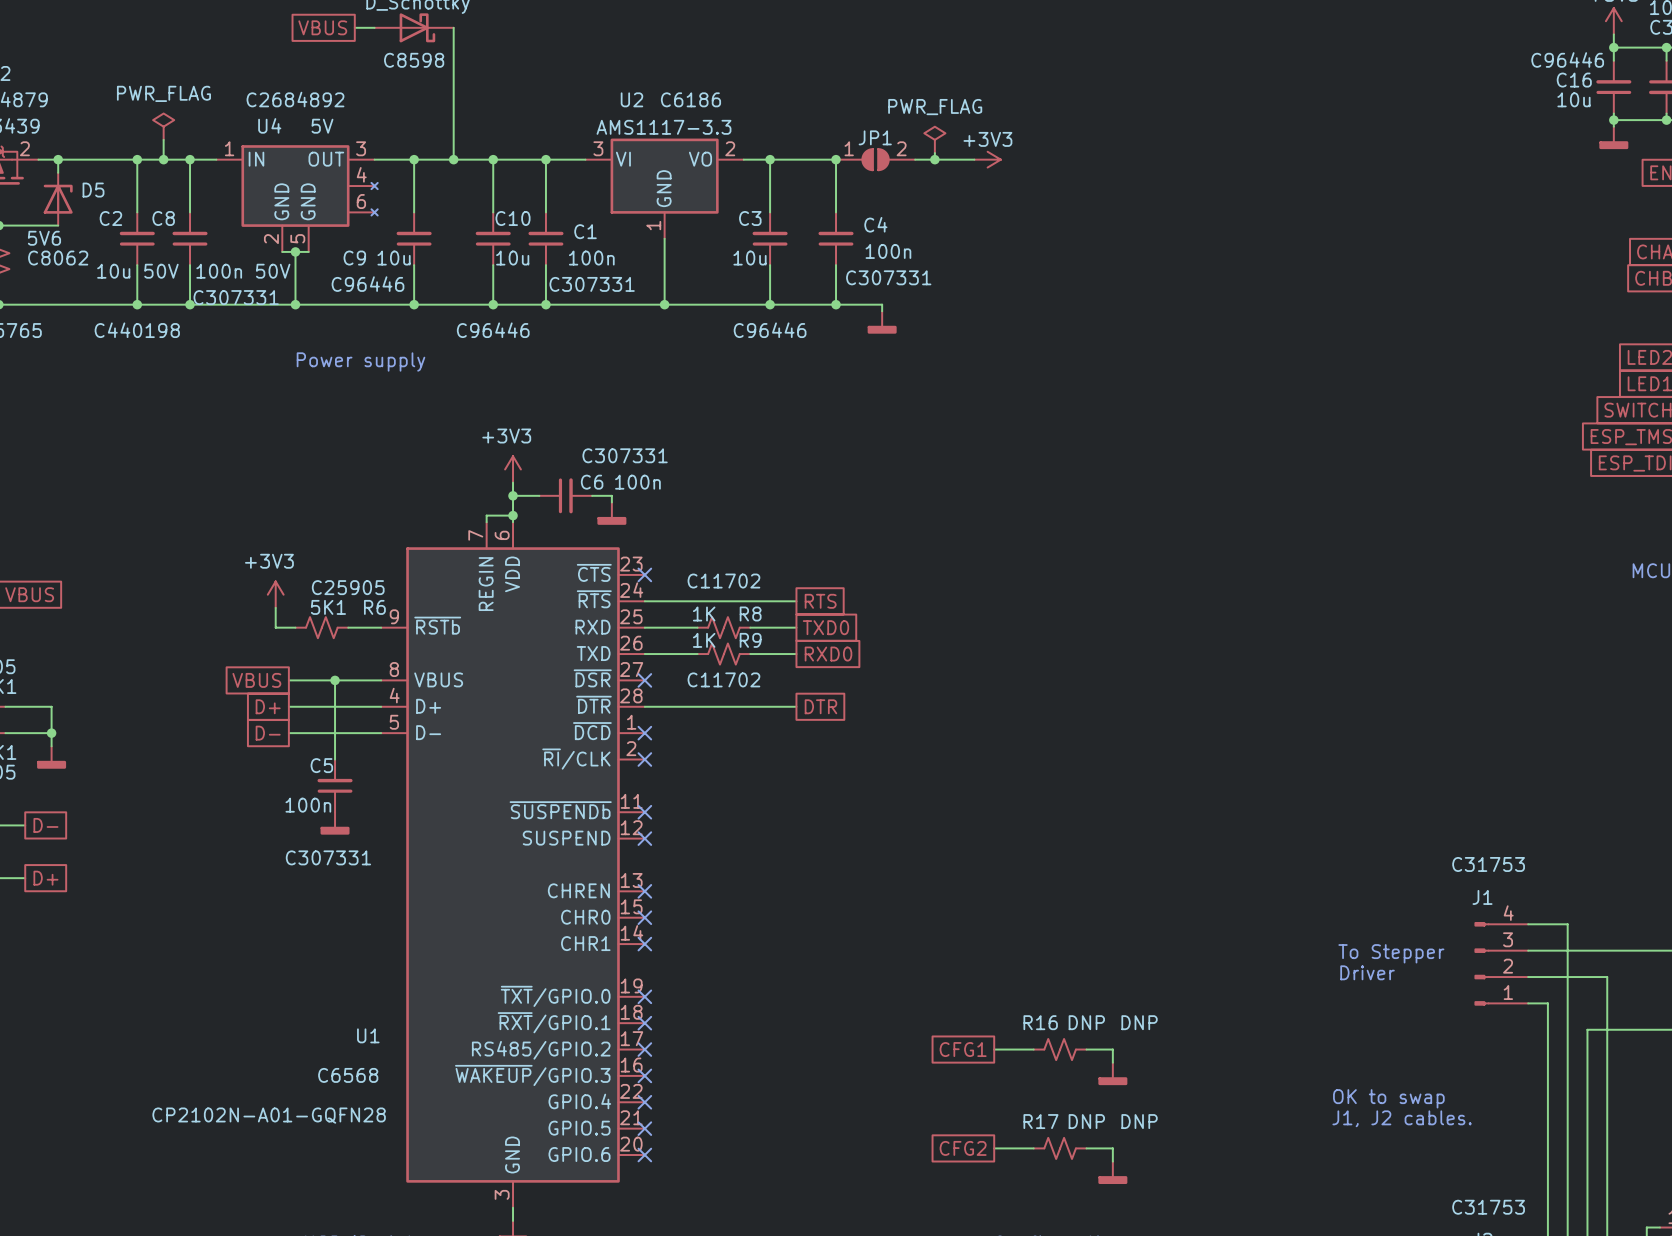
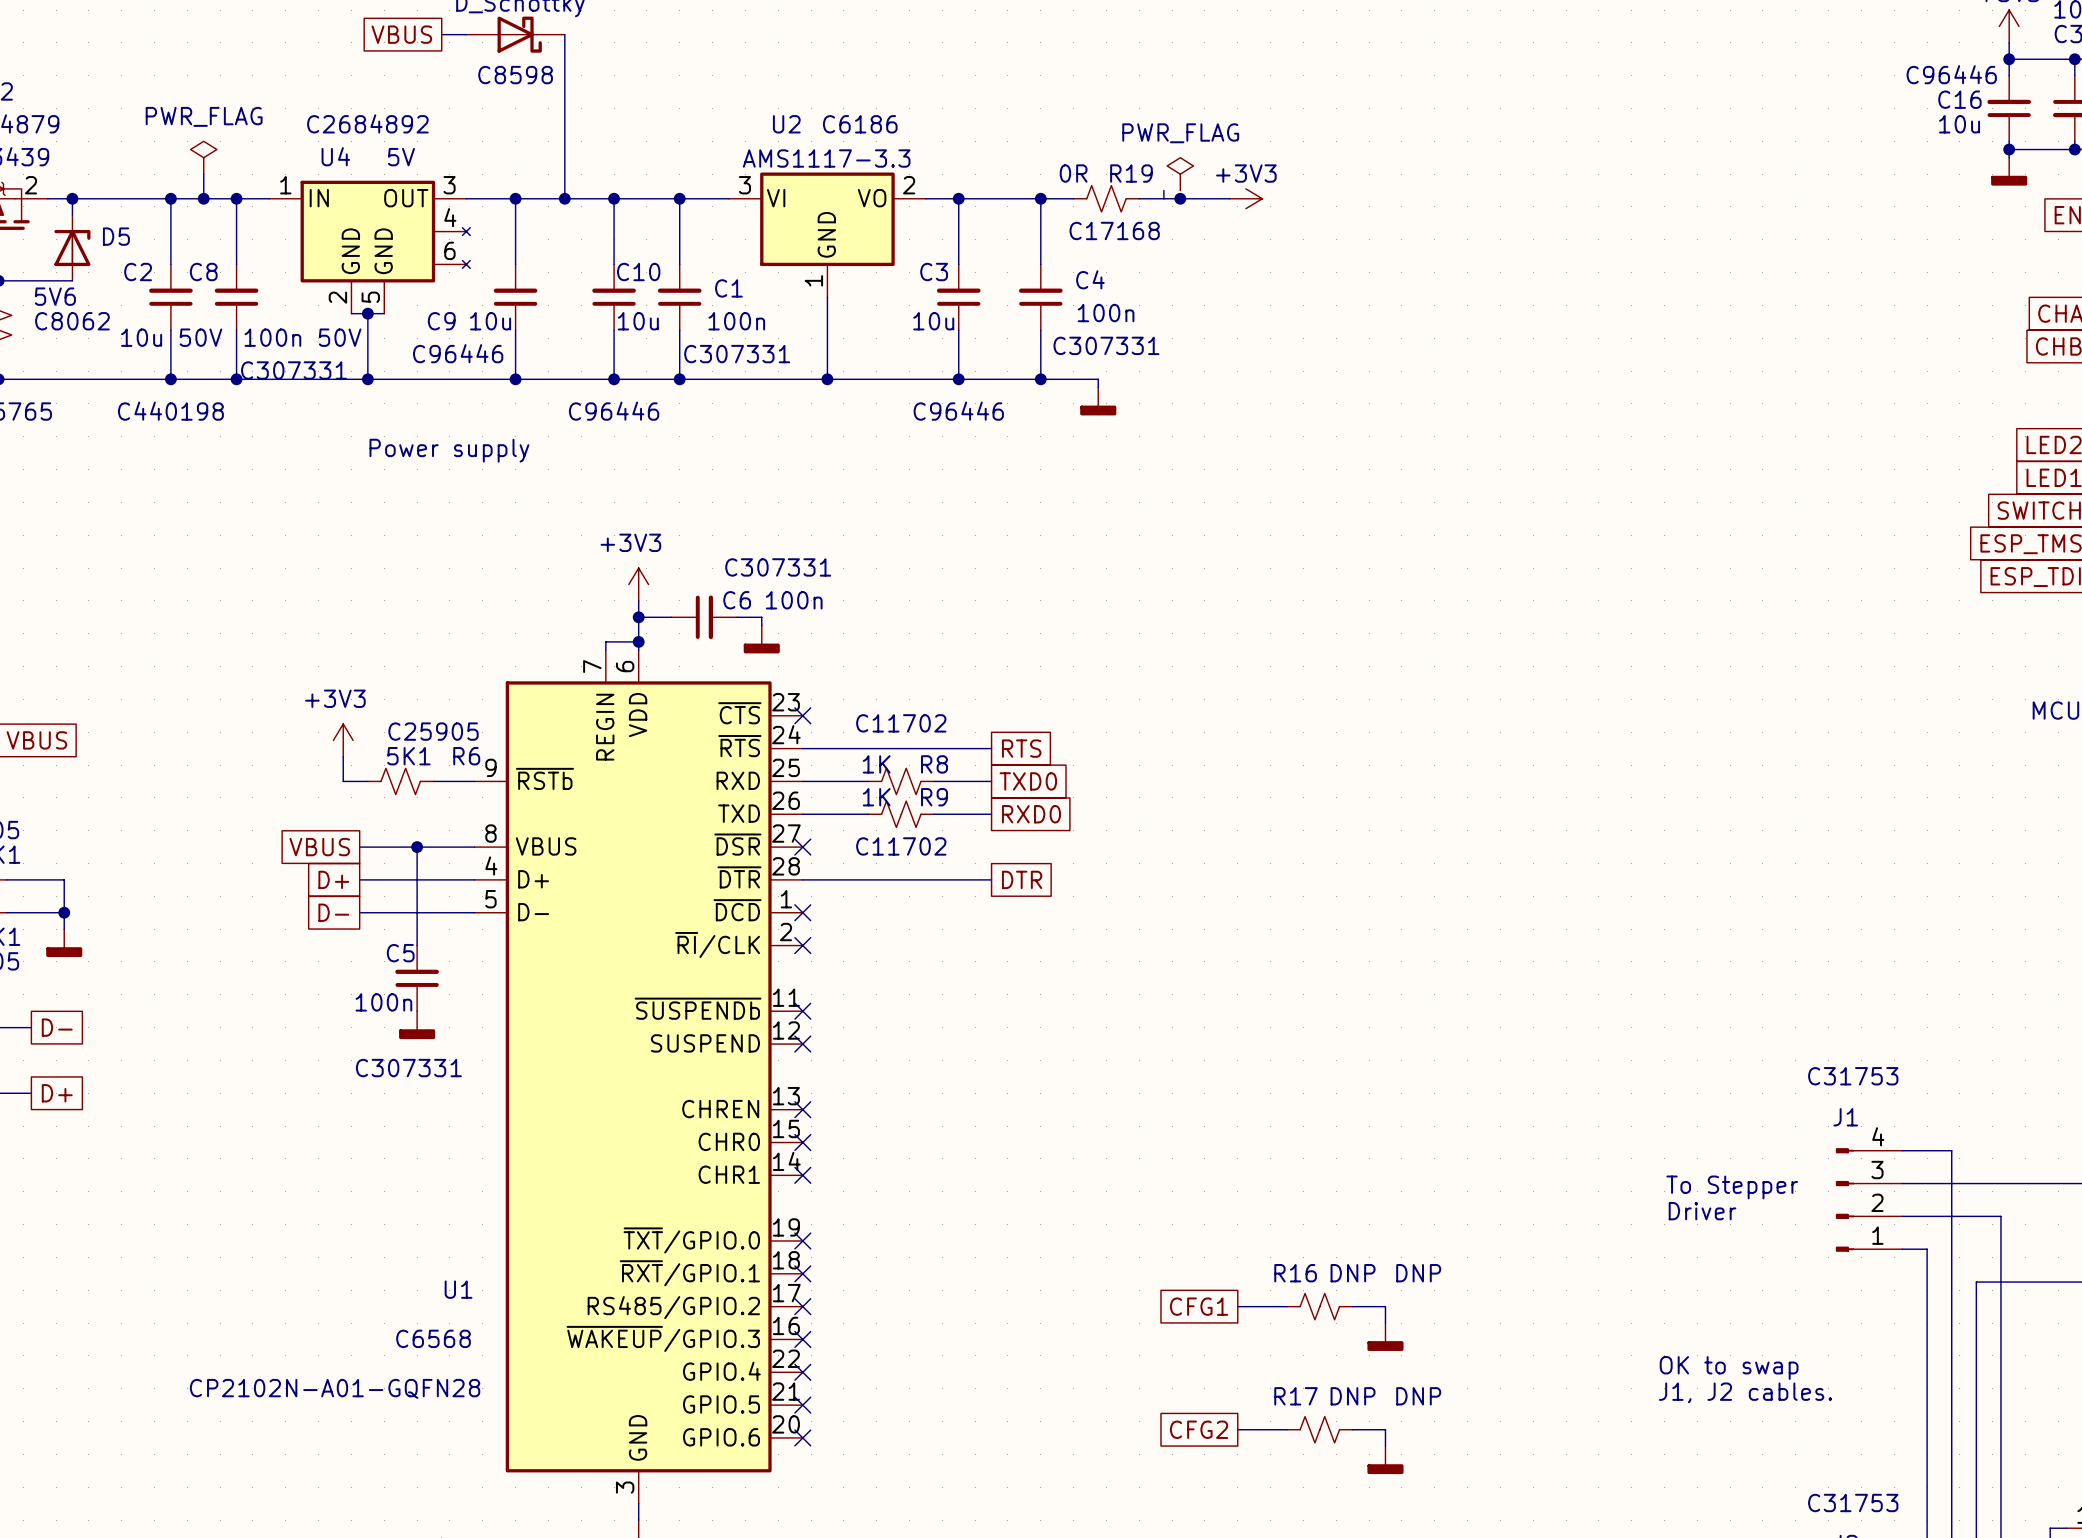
power symbol position: PWR_FLAG (934, 139) -> PWR_FLAG (1180, 174)
JP1: (875, 159) -> none
R19: none -> 0R (1106, 198)
junction position: (934, 159) -> (1180, 198)
power symbol position: +3V3 (987, 159) -> +3V3 (1245, 198)

